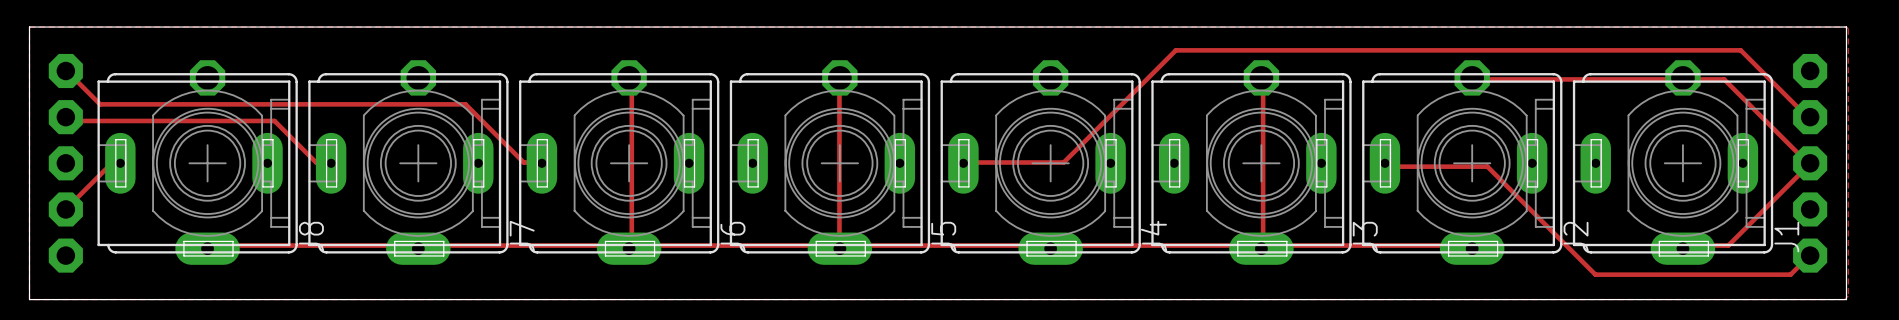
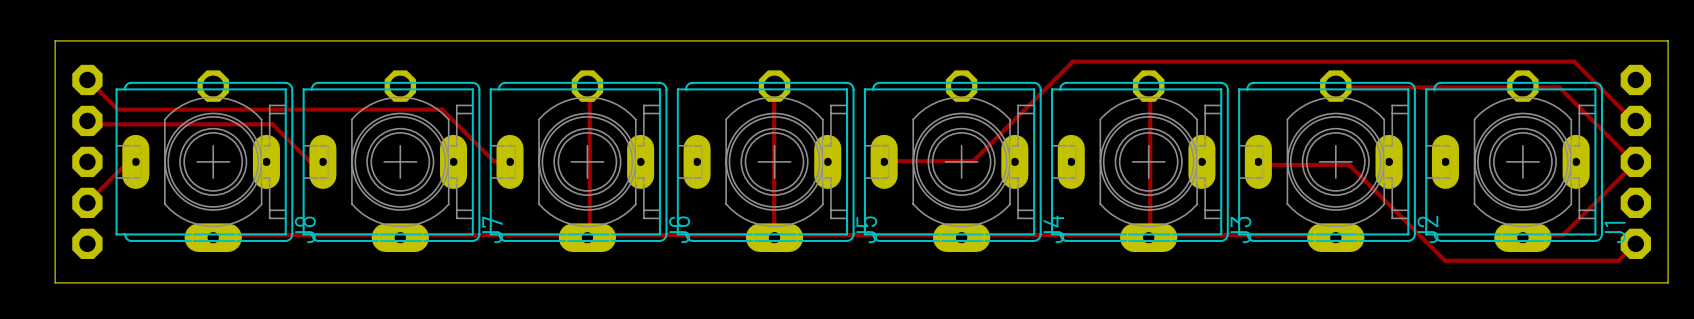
zone outline: (29, 27) (29, 299) (1844, 299) (1848, 295) (1848, 28) (1846, 27) (29, 27) -> none

